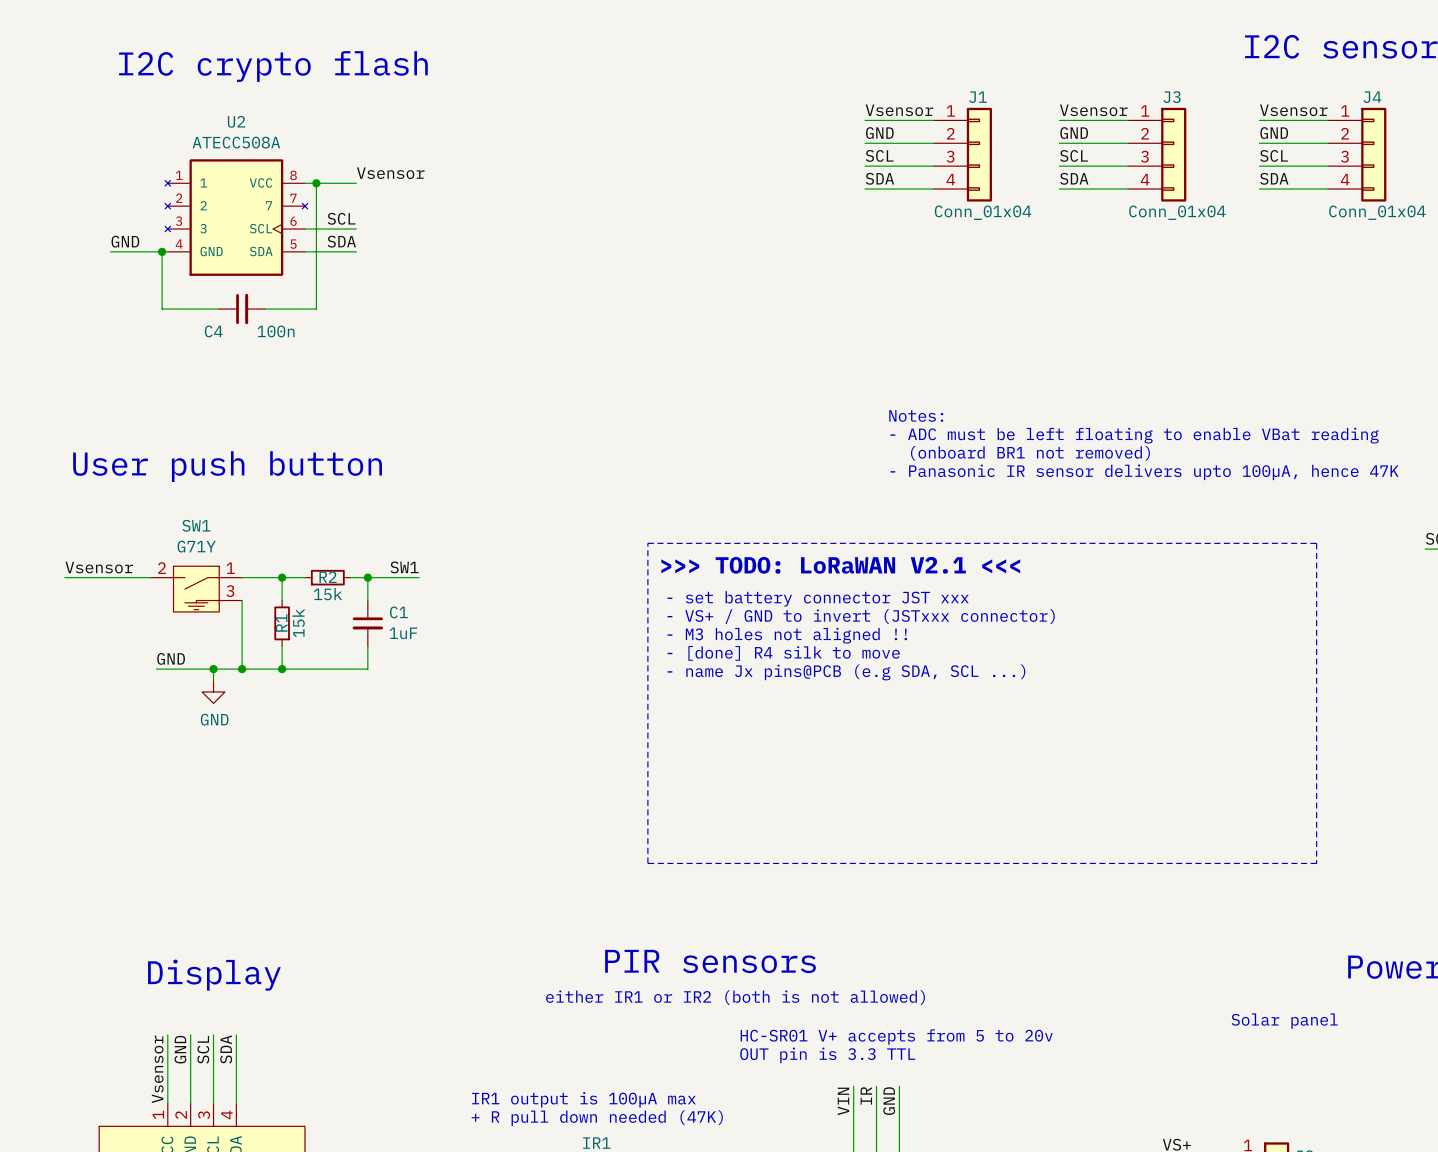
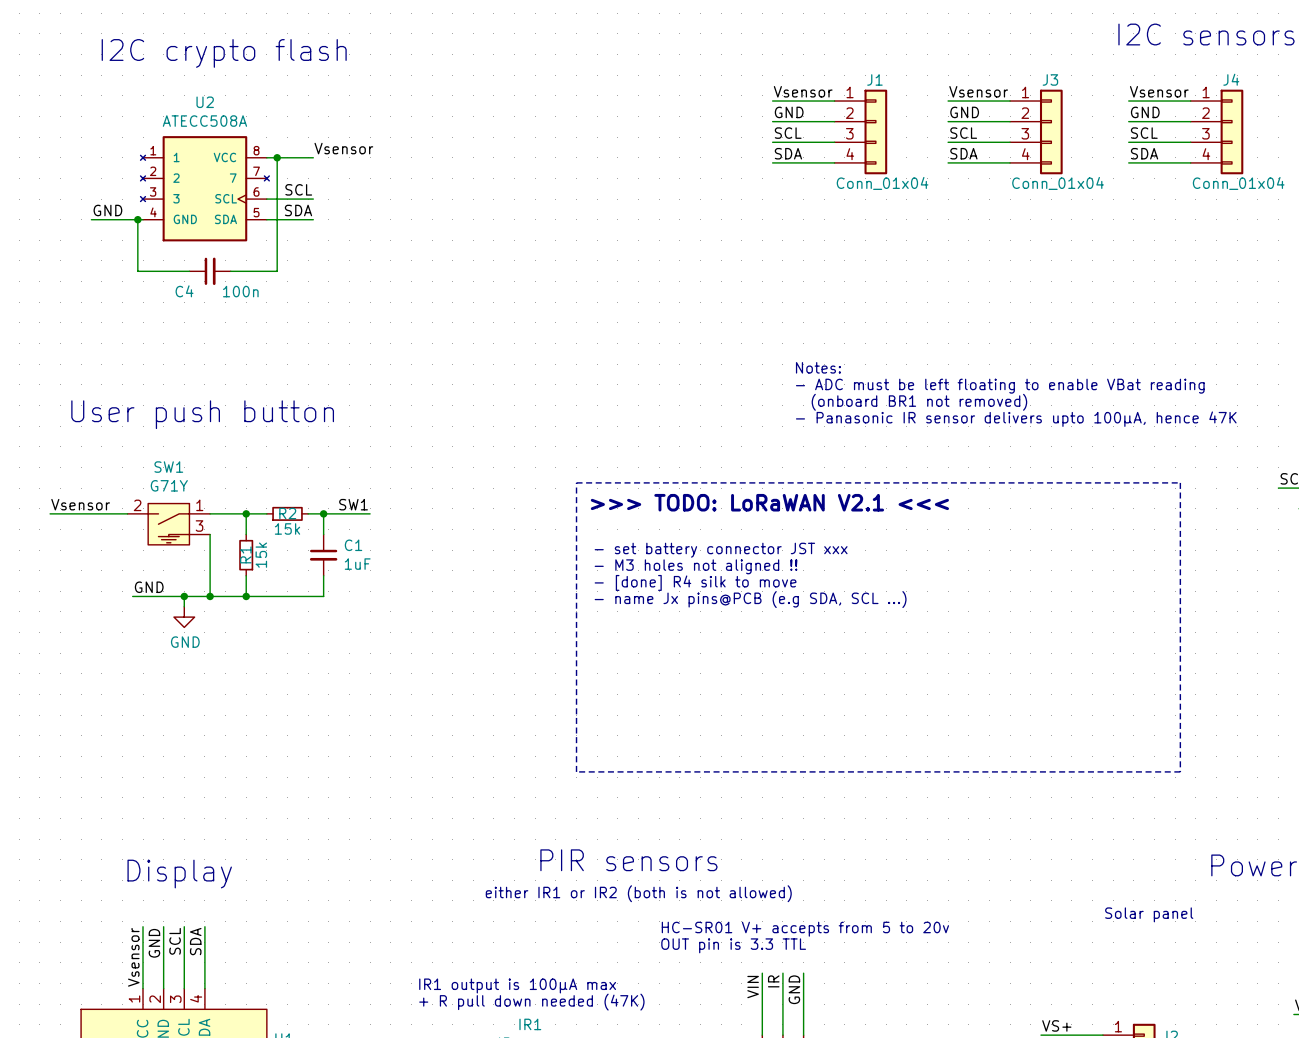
text: - set battery connector JST xxx (818, 598) -> none
text: - VS+ / GND to invert (JSTxxx connector) (861, 616) -> - set battery connector JST xxx (721, 550)

